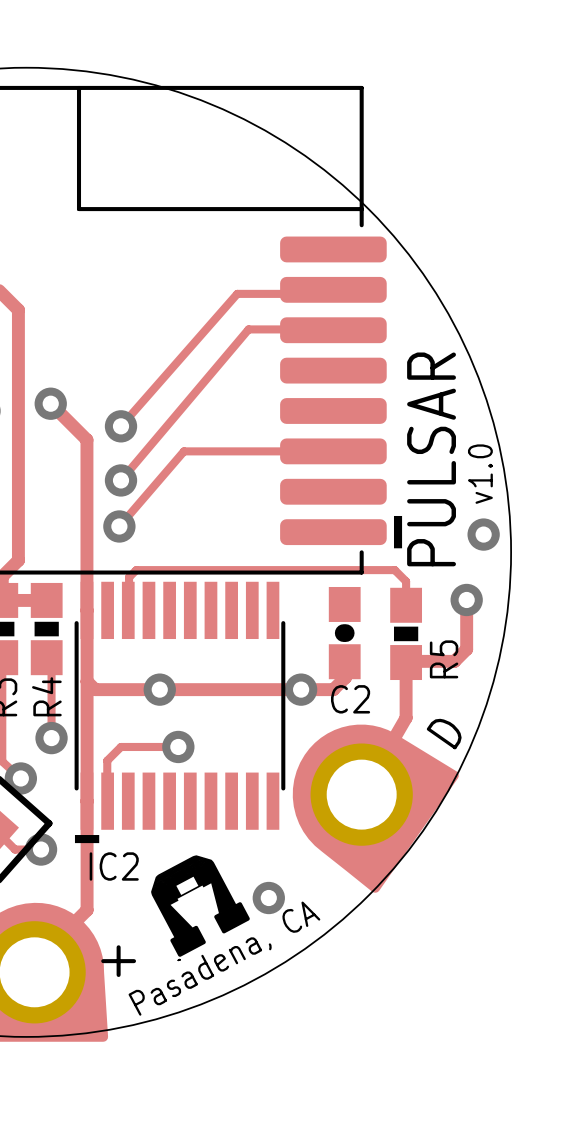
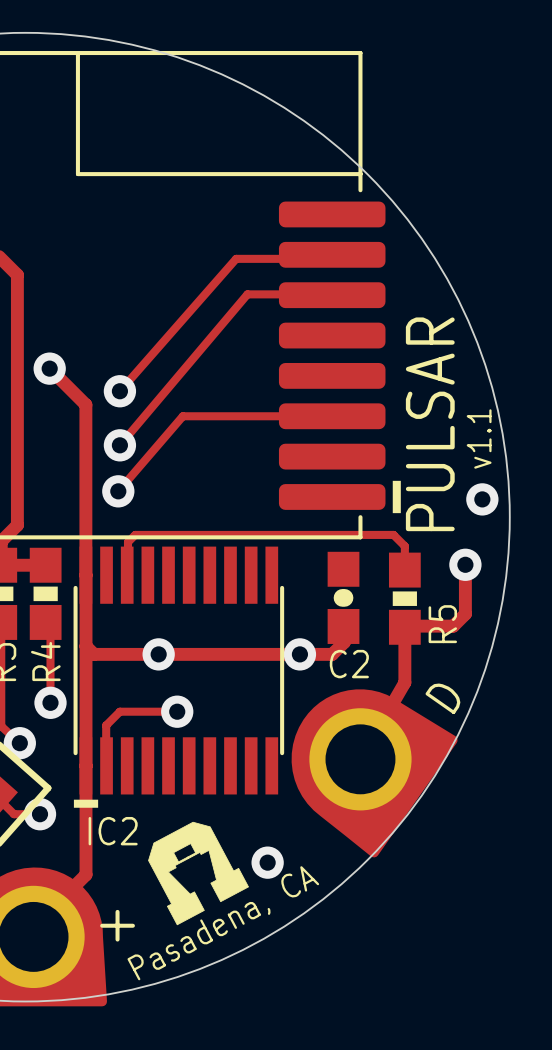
text: v1.0 (480, 474) -> v1.1 (479, 438)
drawing shape: [151, 855, 250, 961] -> [148, 821, 249, 926]

